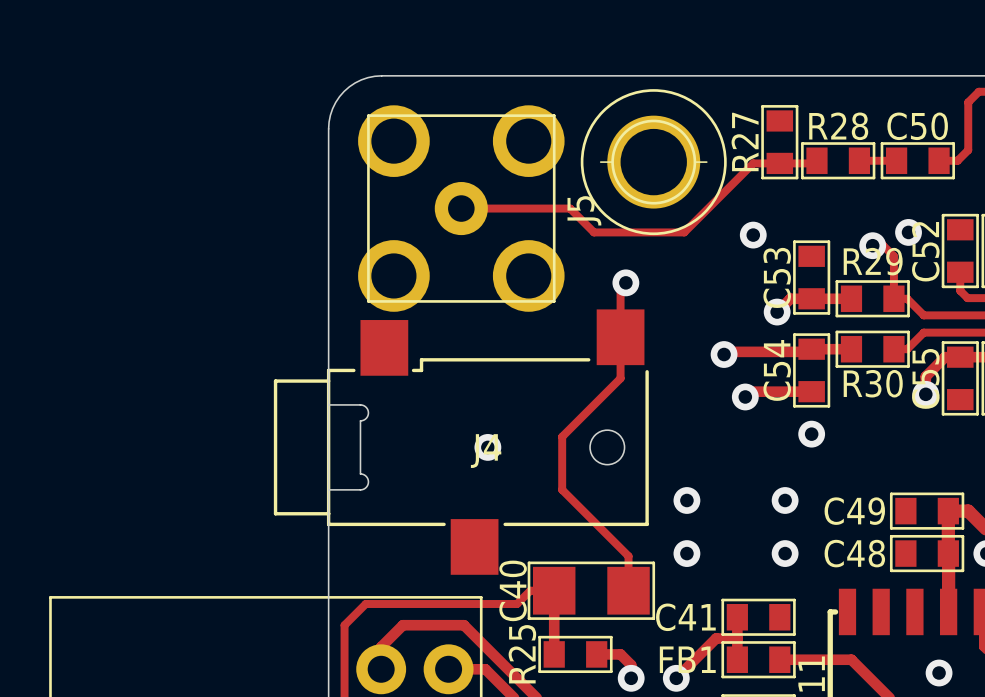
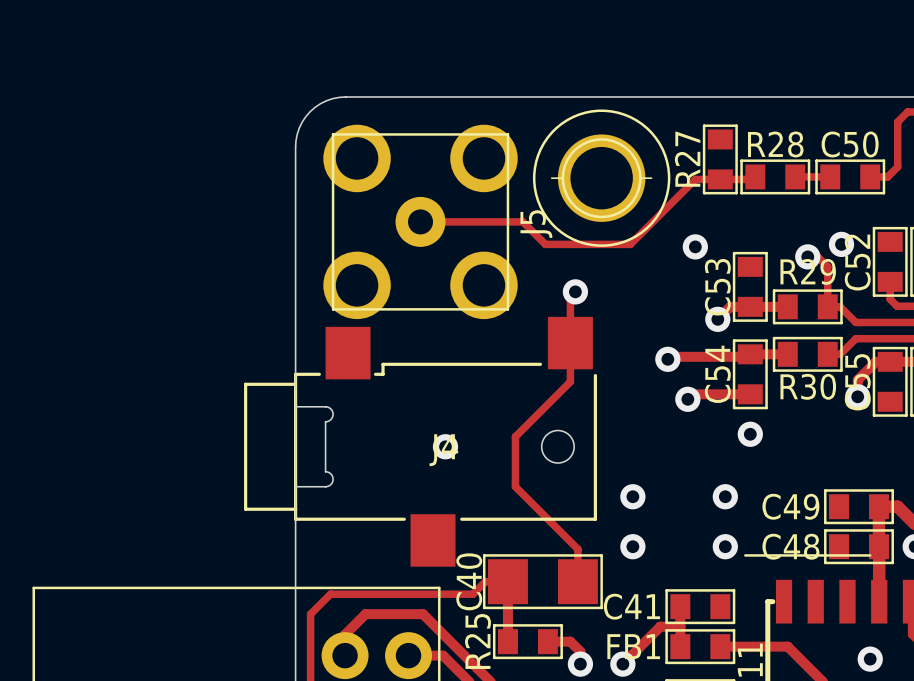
line: none -> (745, 555) (870, 555)

